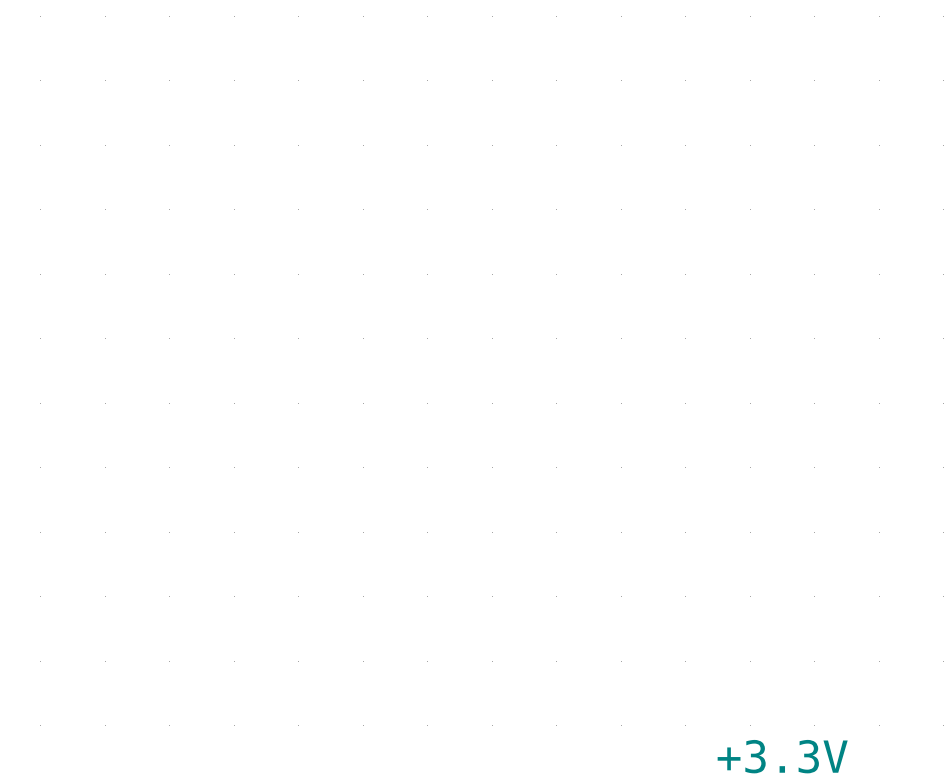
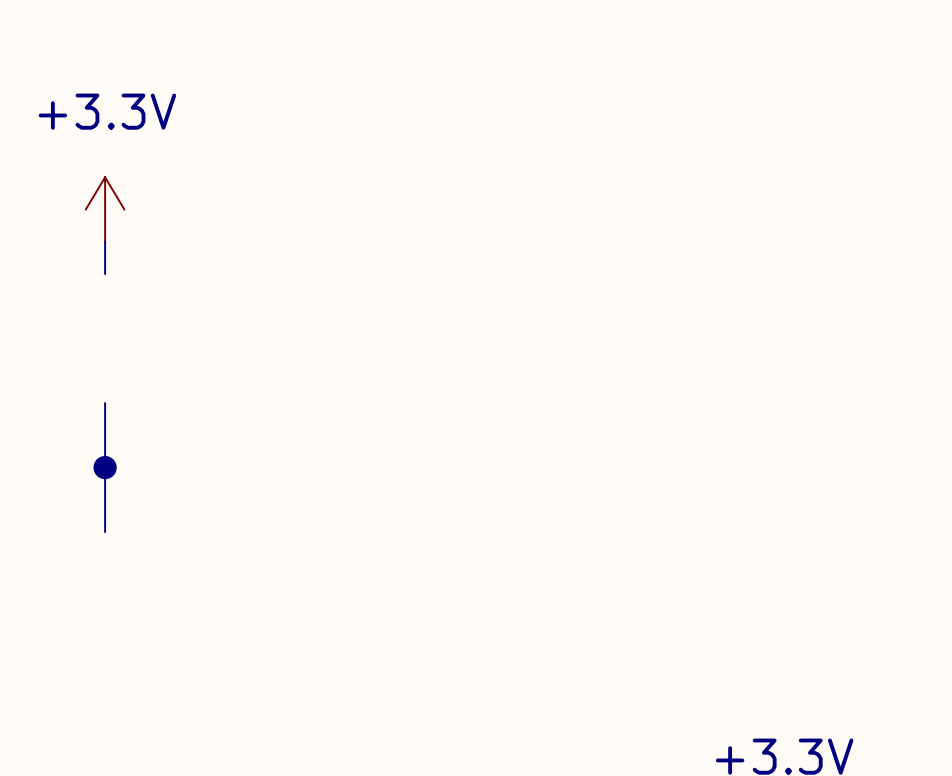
power symbol: none -> +3.3V (105, 209)
wire: none -> (105, 241) (105, 274)
wire: none -> (105, 403) (105, 532)
junction: none -> (105, 467)

